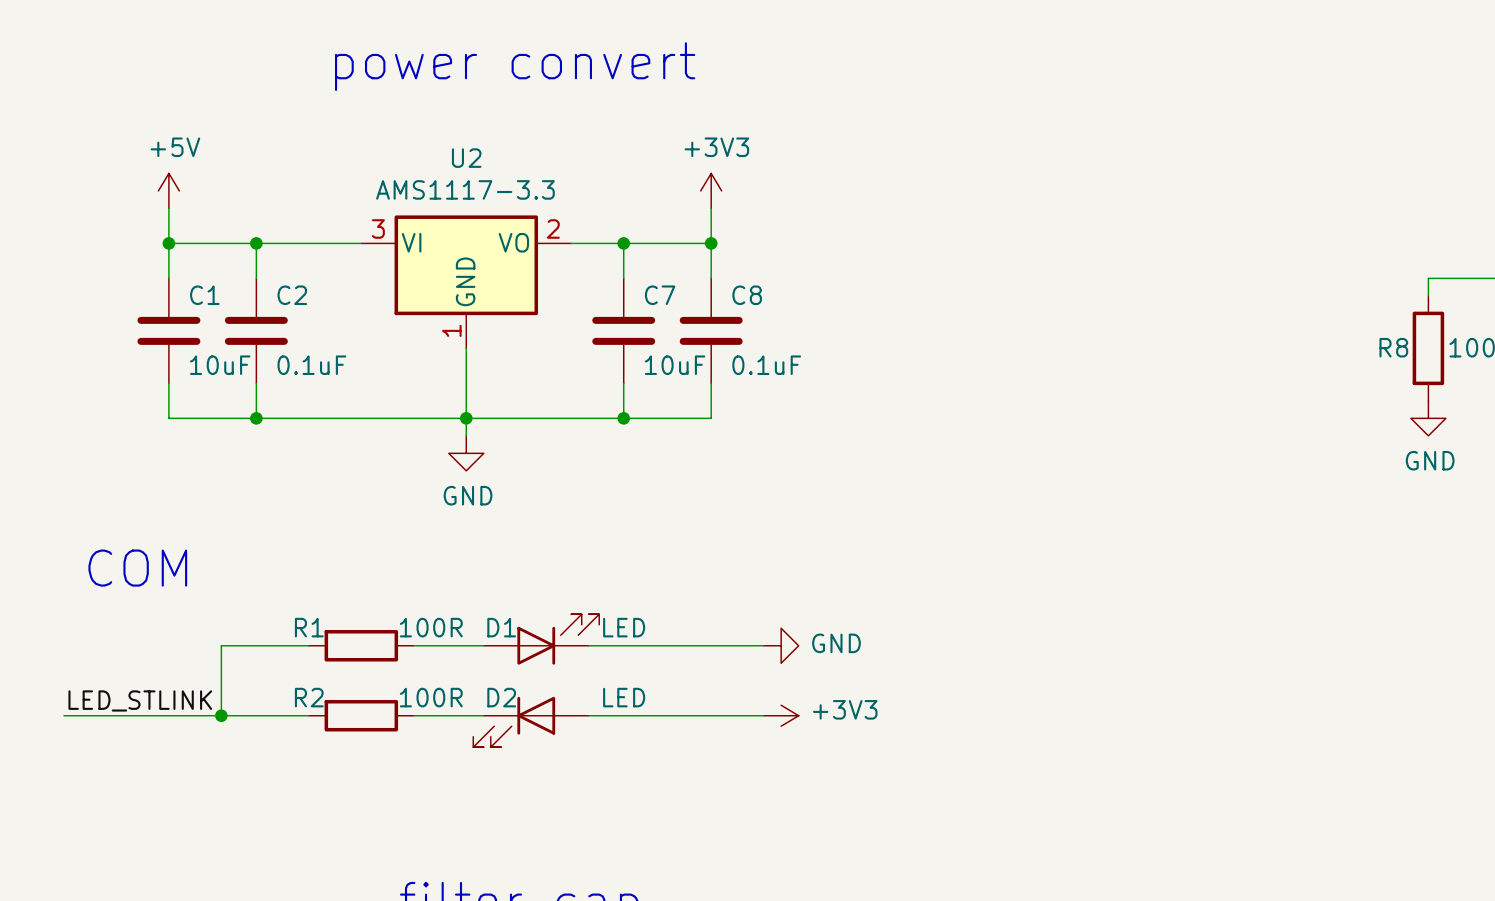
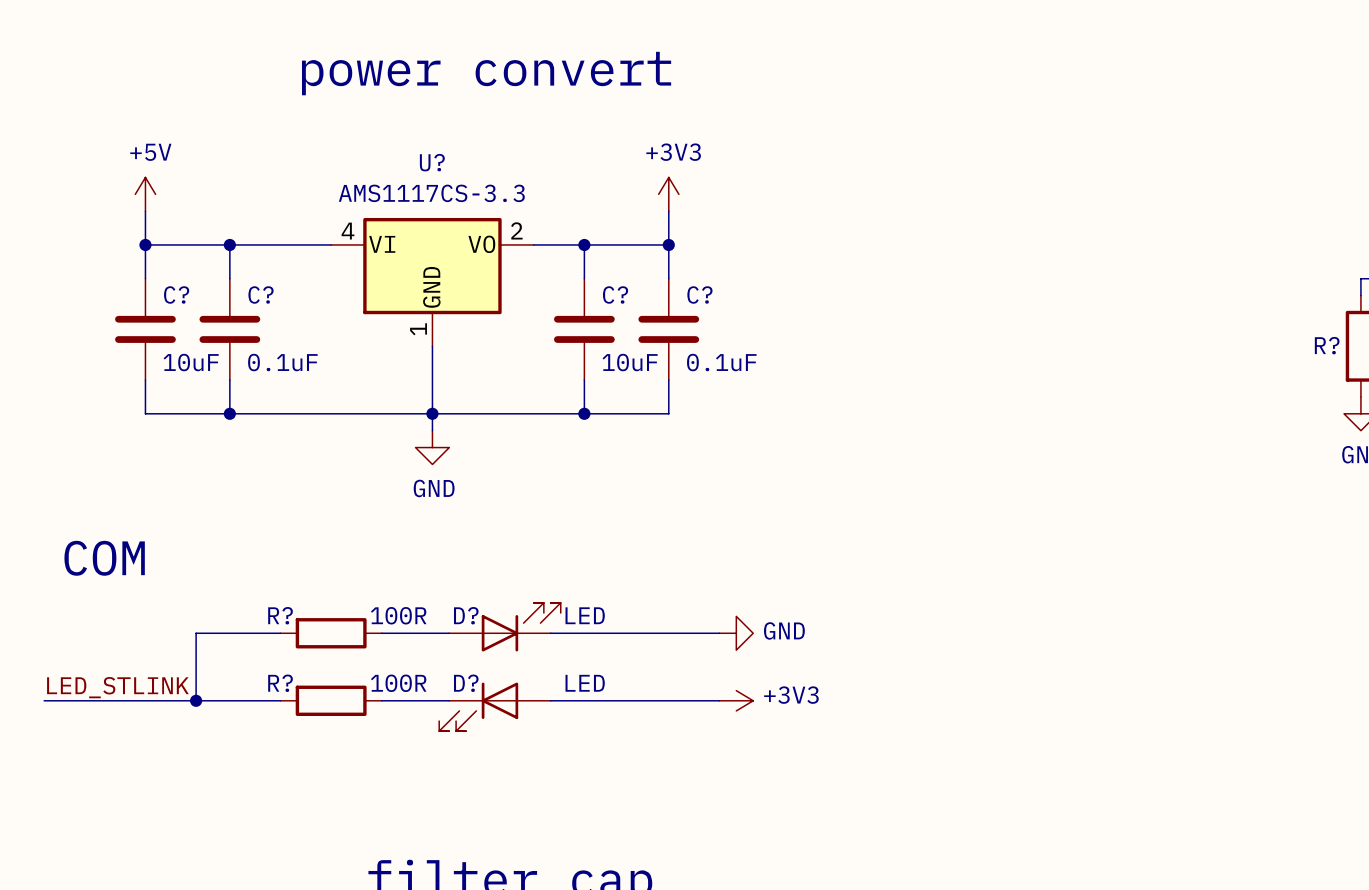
U2 name: U2 (466, 158) -> U? (432, 162)
U2 value: AMS1117-3.3 (465, 189) -> AMS1117CS-3.3 (431, 193)
U2 pin number: 3 (378, 228) -> 4 (347, 231)
C1 name: C1 (204, 295) -> C? (176, 295)
C2 name: C2 (292, 295) -> C? (261, 295)
C7 name: C7 (660, 295) -> C? (615, 295)
C8 name: C8 (747, 295) -> C? (699, 295)
R8 name: R8 (1393, 347) -> R? (1327, 345)
R1 name: R1 (309, 627) -> R? (280, 615)
D1 name: D1 (501, 627) -> D? (466, 615)
R2 name: R2 (309, 697) -> R? (280, 683)
D2 name: D2 (501, 697) -> D? (466, 683)

